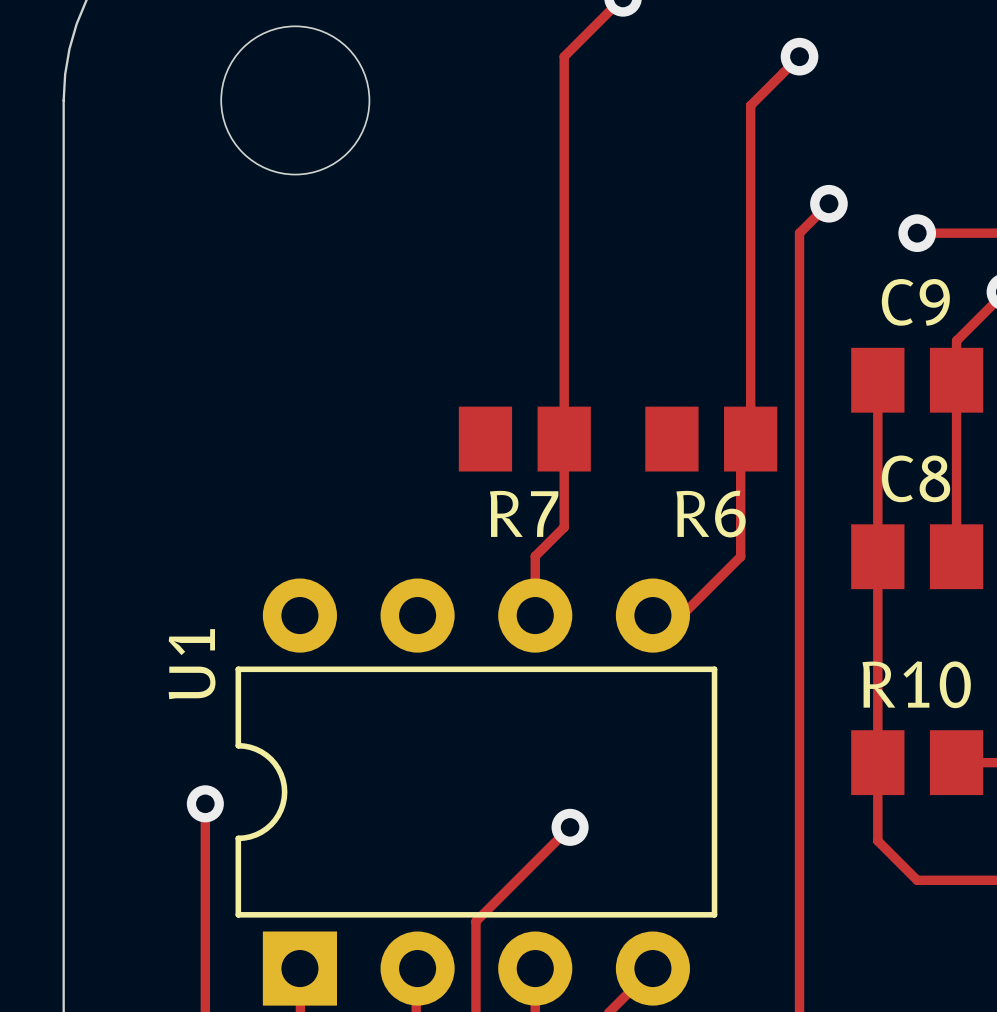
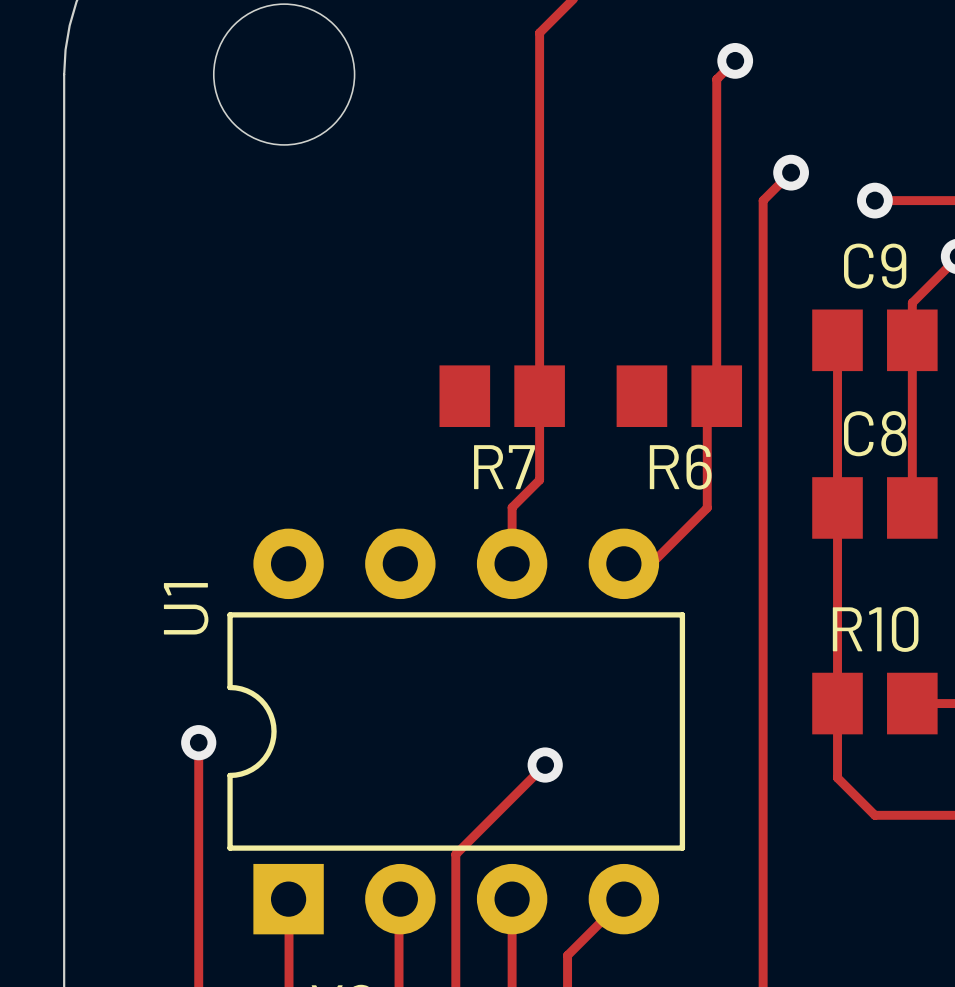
track: (799, 56) (770, 86) -> none
via position: (799, 56) -> (735, 60)

